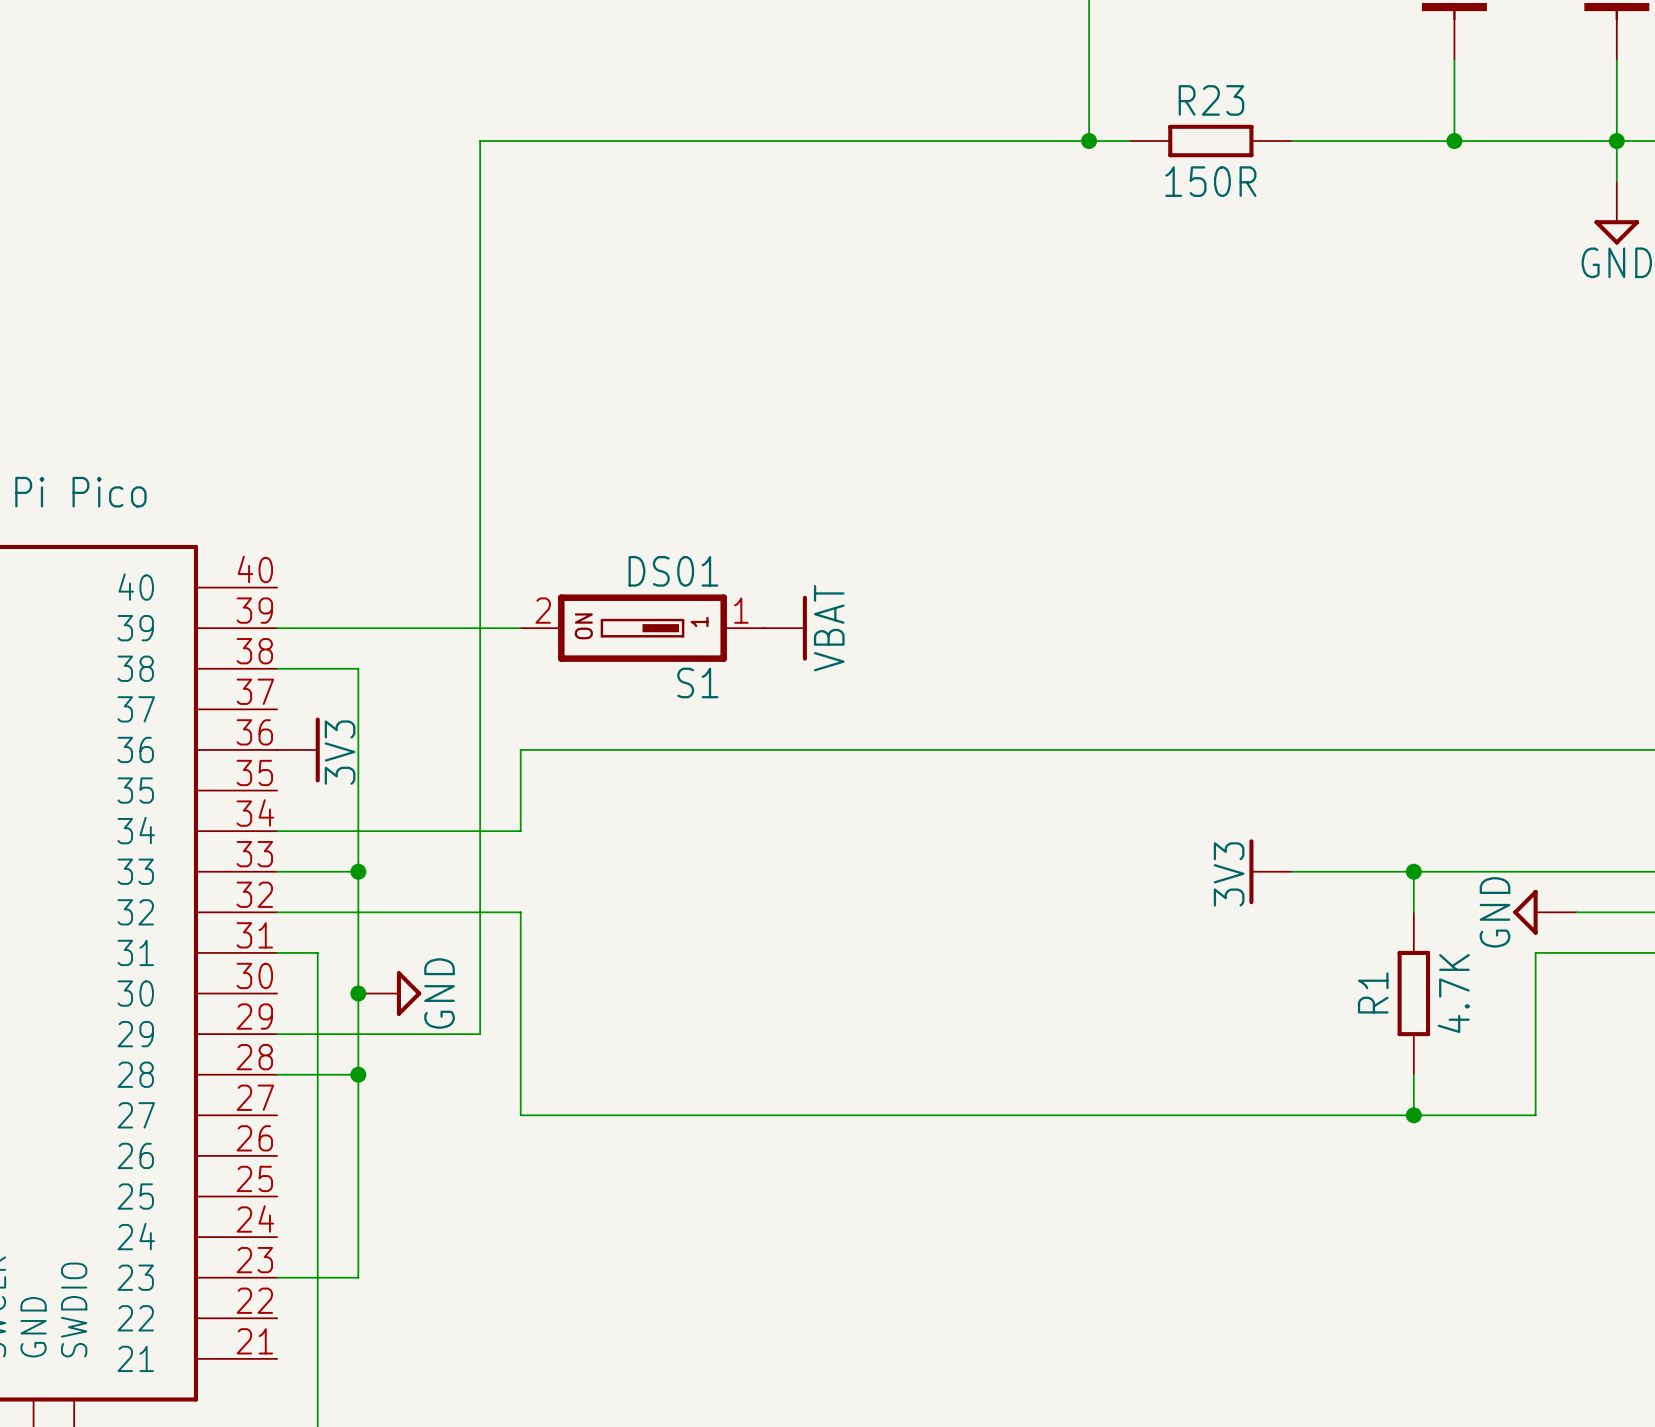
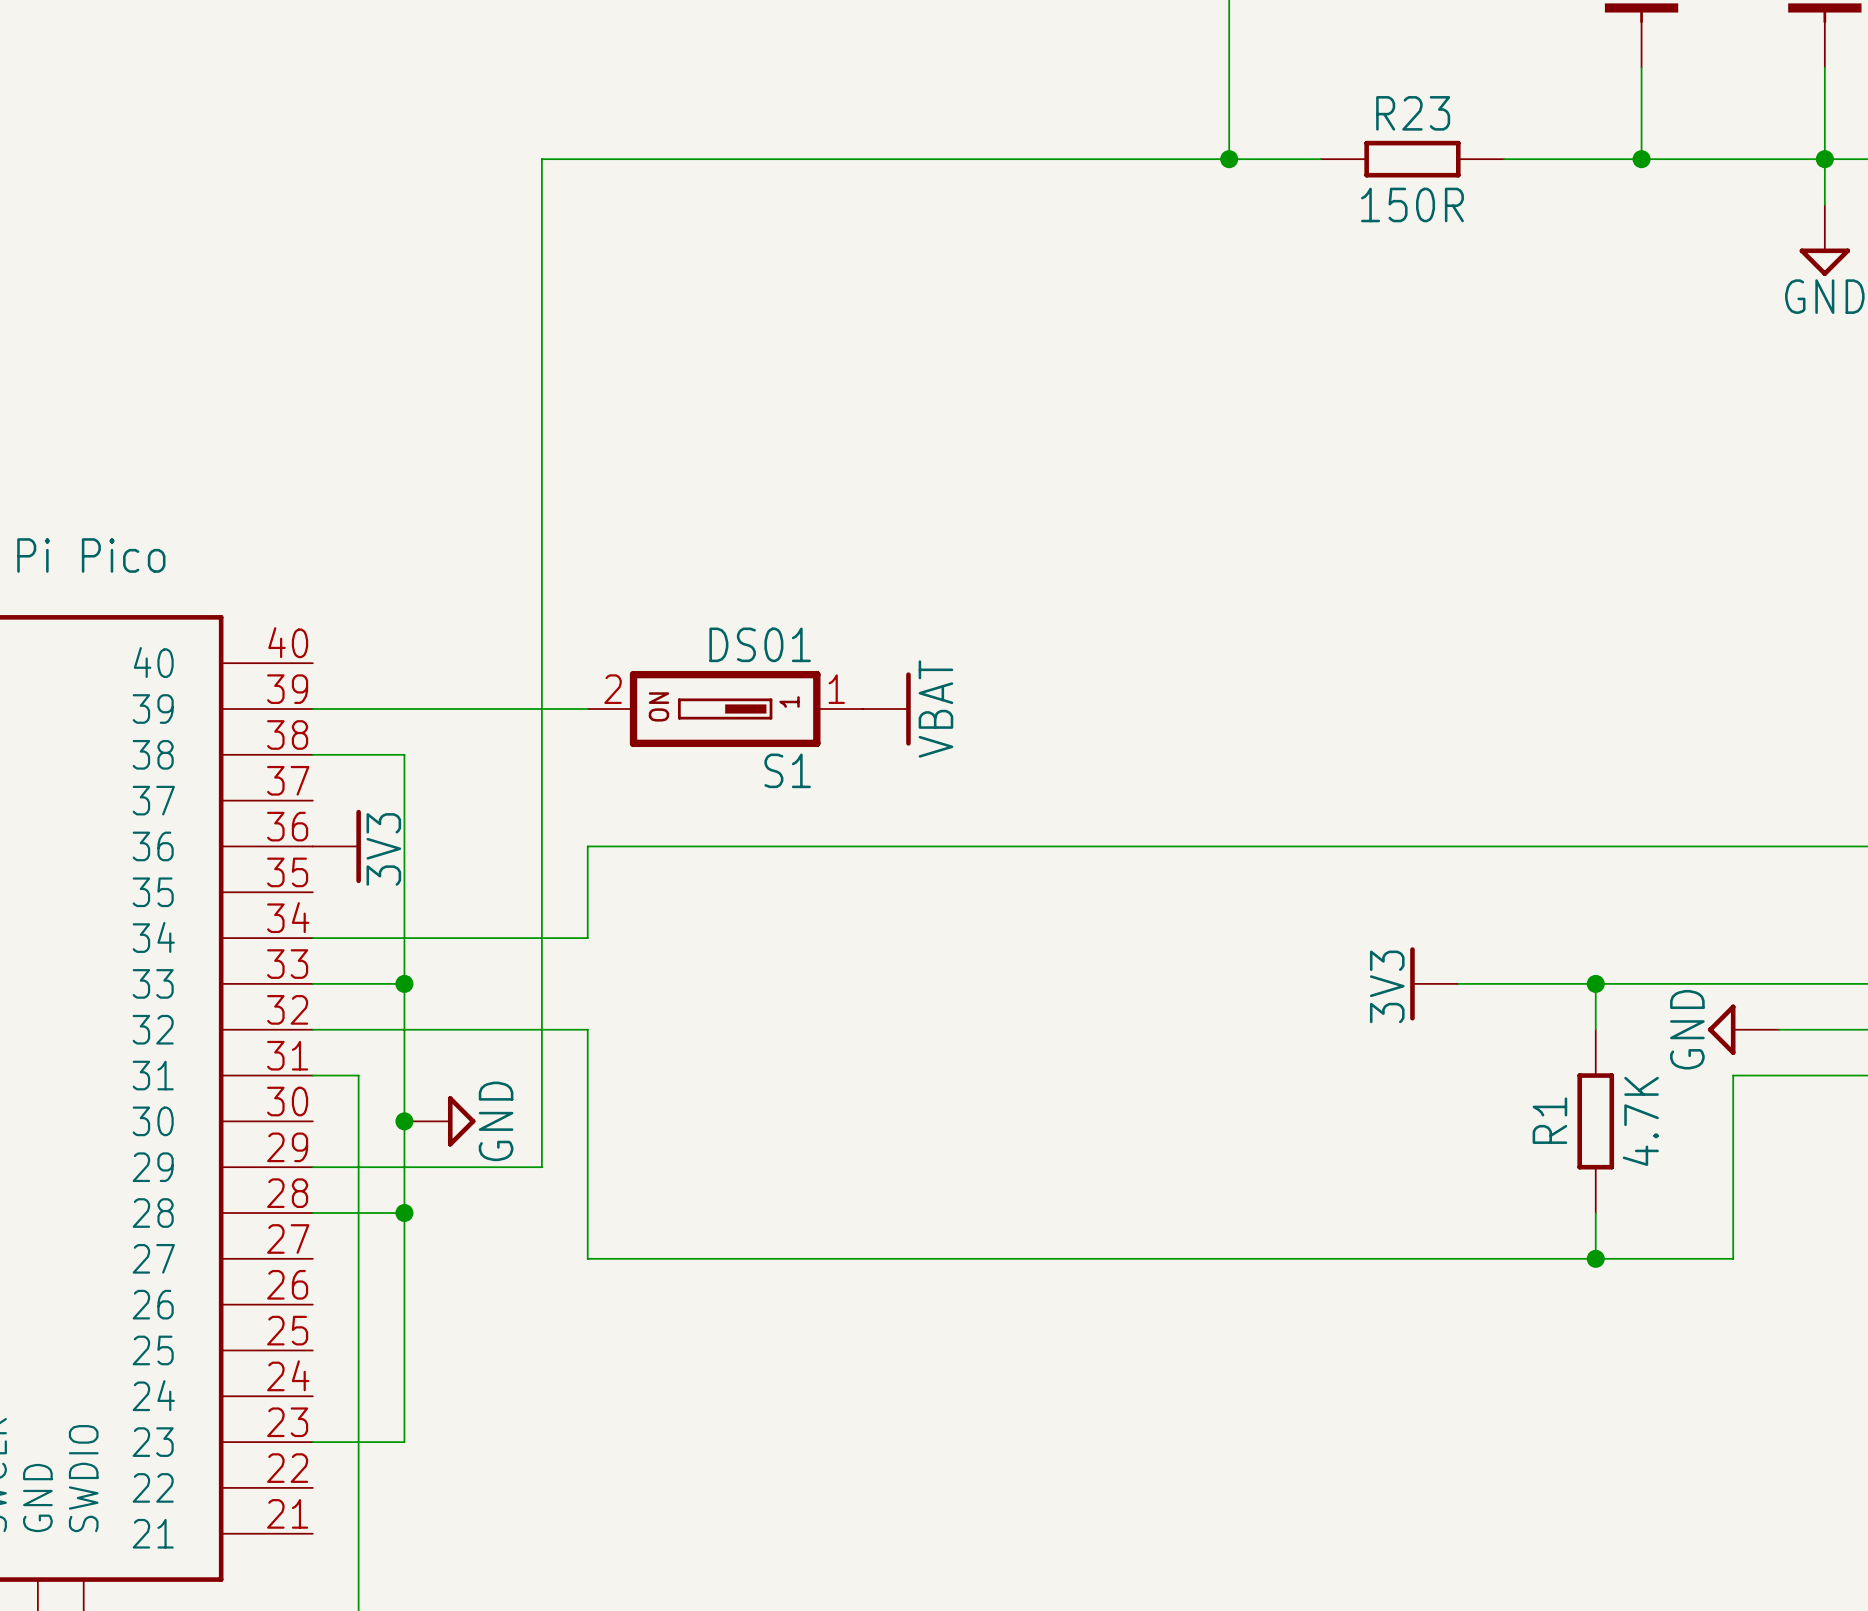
R23 position: (1210, 141) -> (1412, 159)

